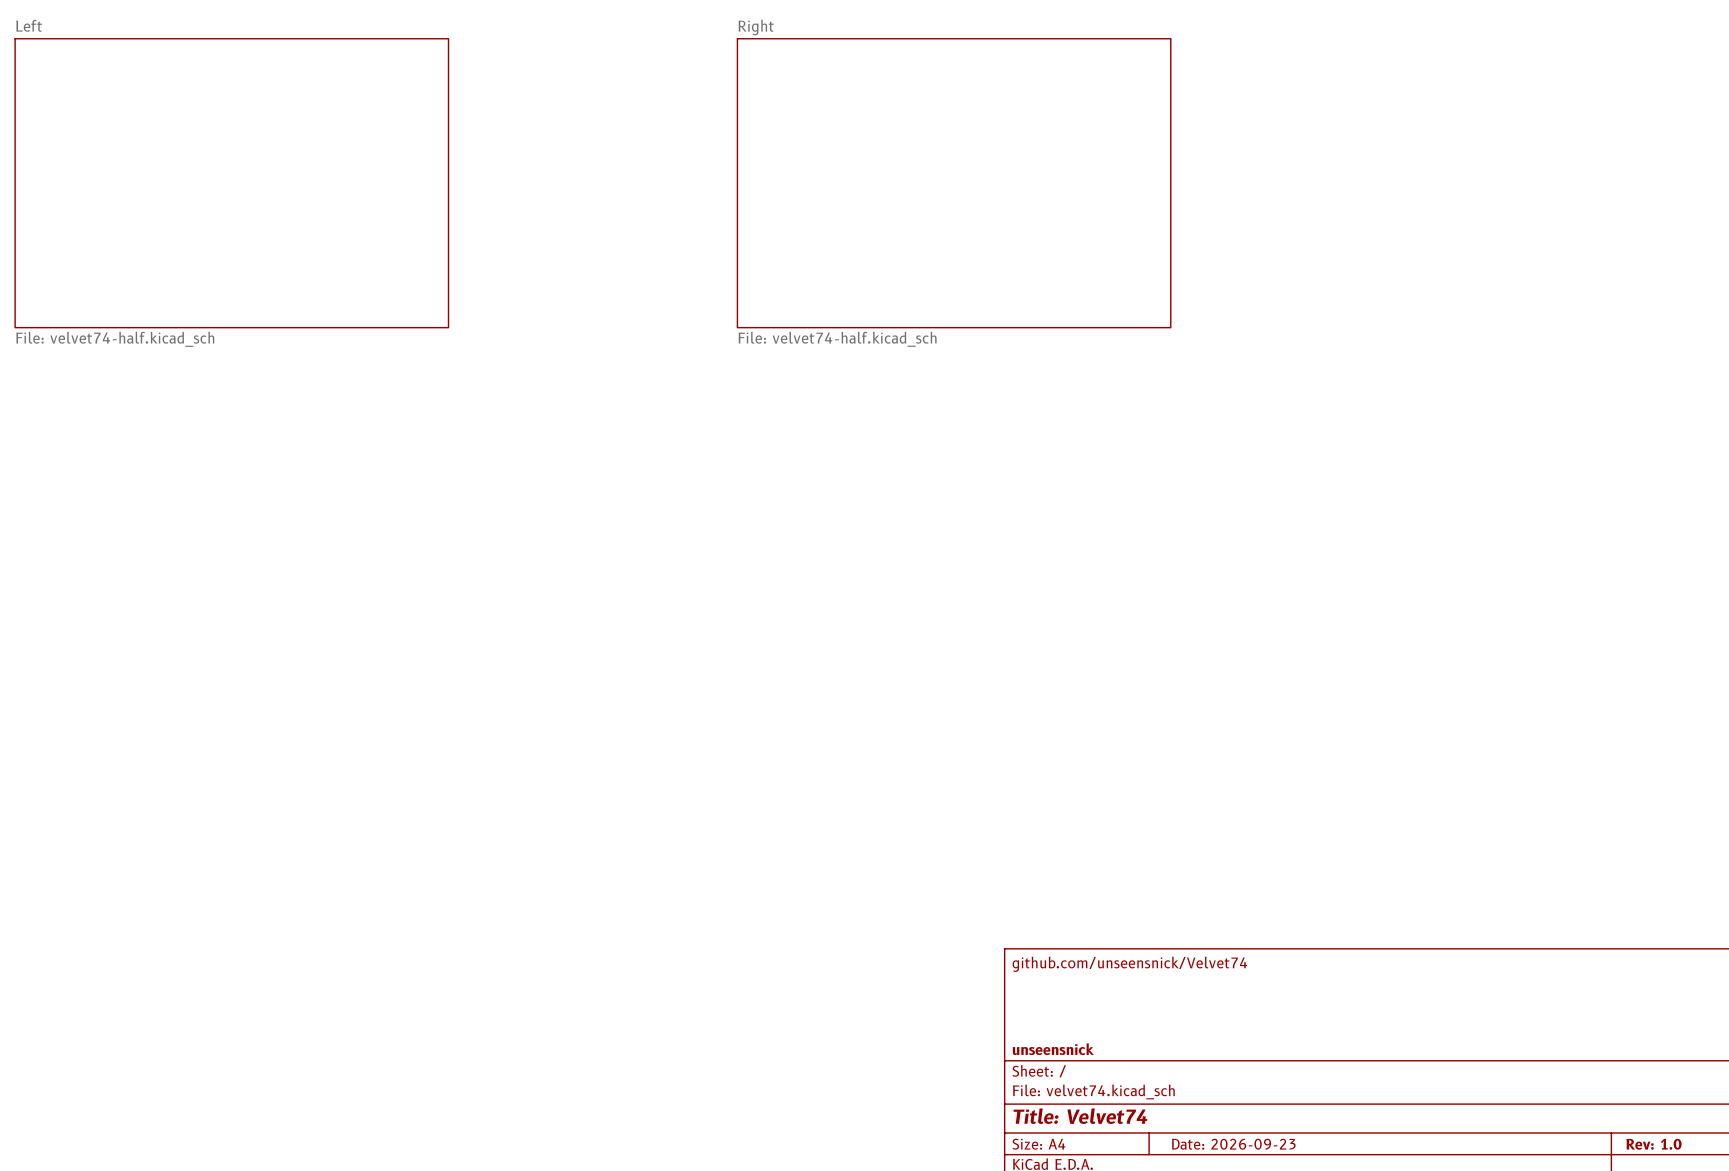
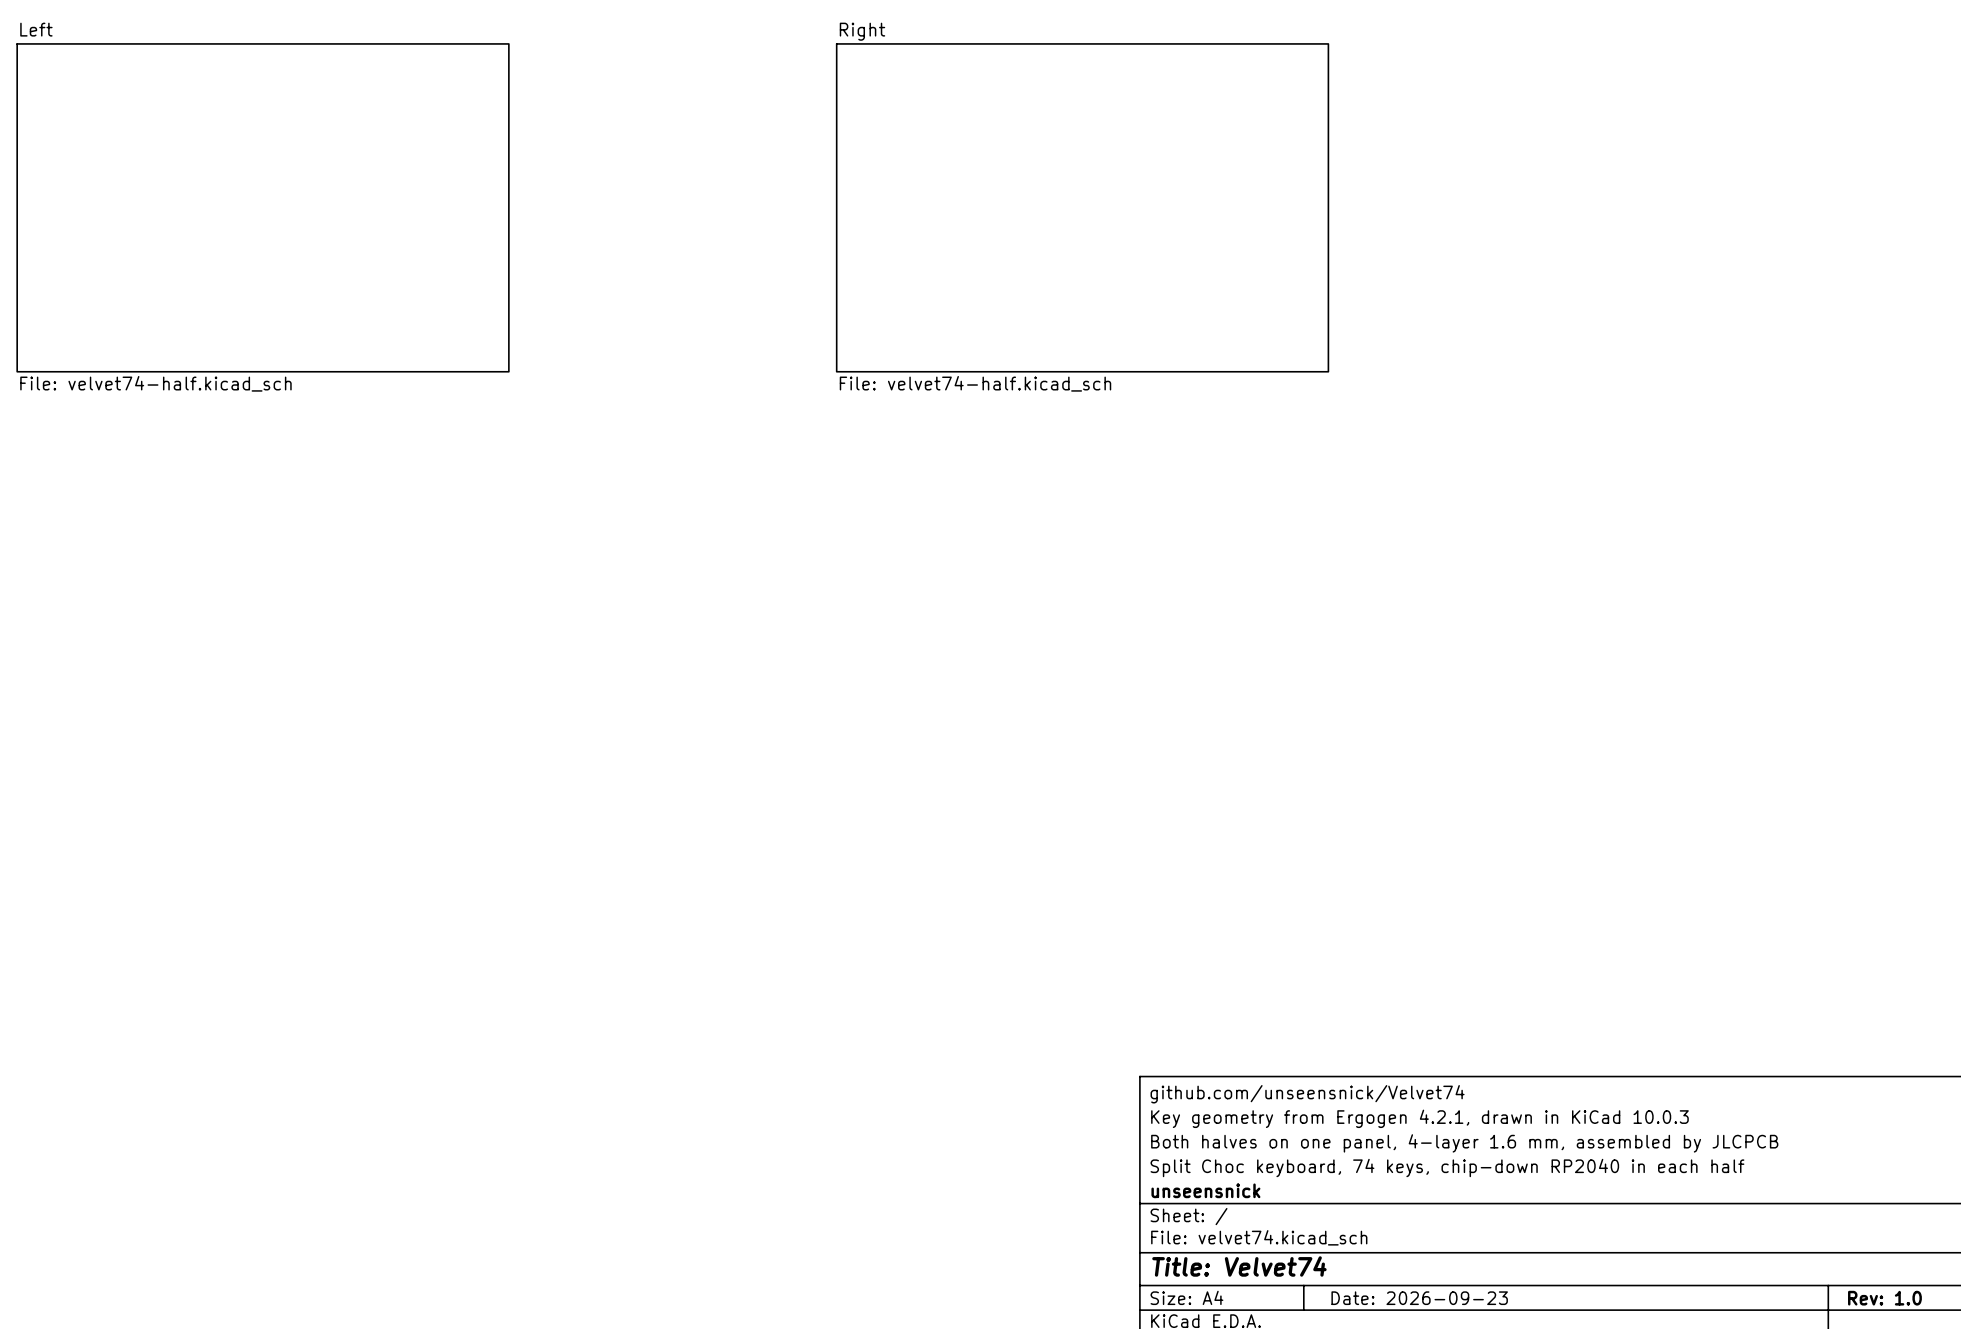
title block: none -> Key geometry from Ergogen 4.2.1, drawn in KiCad 10.0.3 (1419, 1118)
title block: none -> Both halves on one panel, 4-layer 1.6 mm, assembled by JLCPCB (1464, 1143)
title block: none -> Split Choc keyboard, 74 keys, chip-down RP2040 in each half (1447, 1167)

